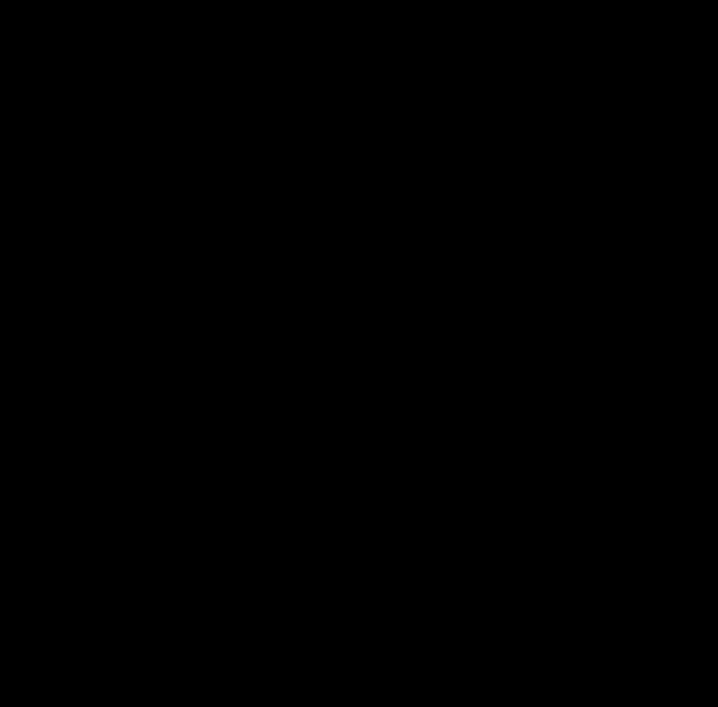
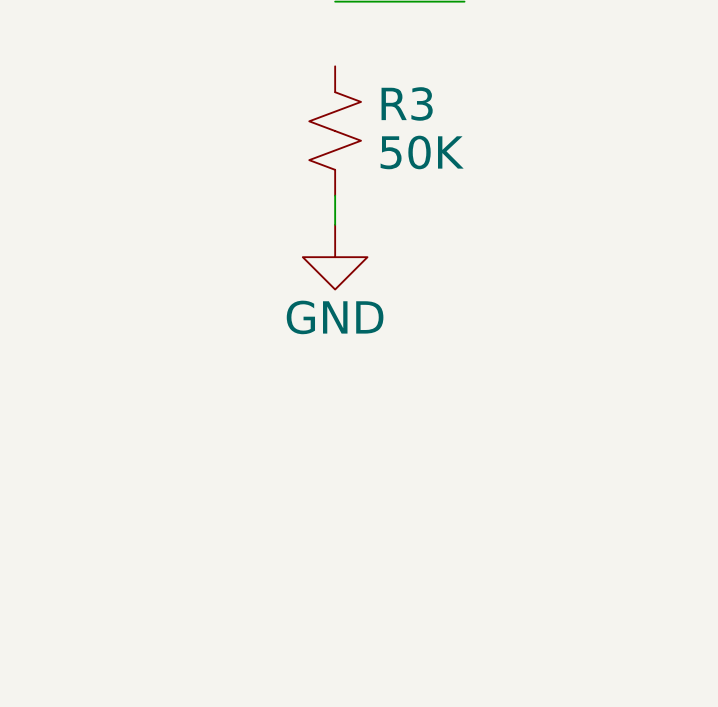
wire: none -> (335, 1) (464, 1)
R3: none -> 50K (335, 131)
wire: none -> (335, 195) (335, 224)
power symbol: none -> GND (335, 257)

